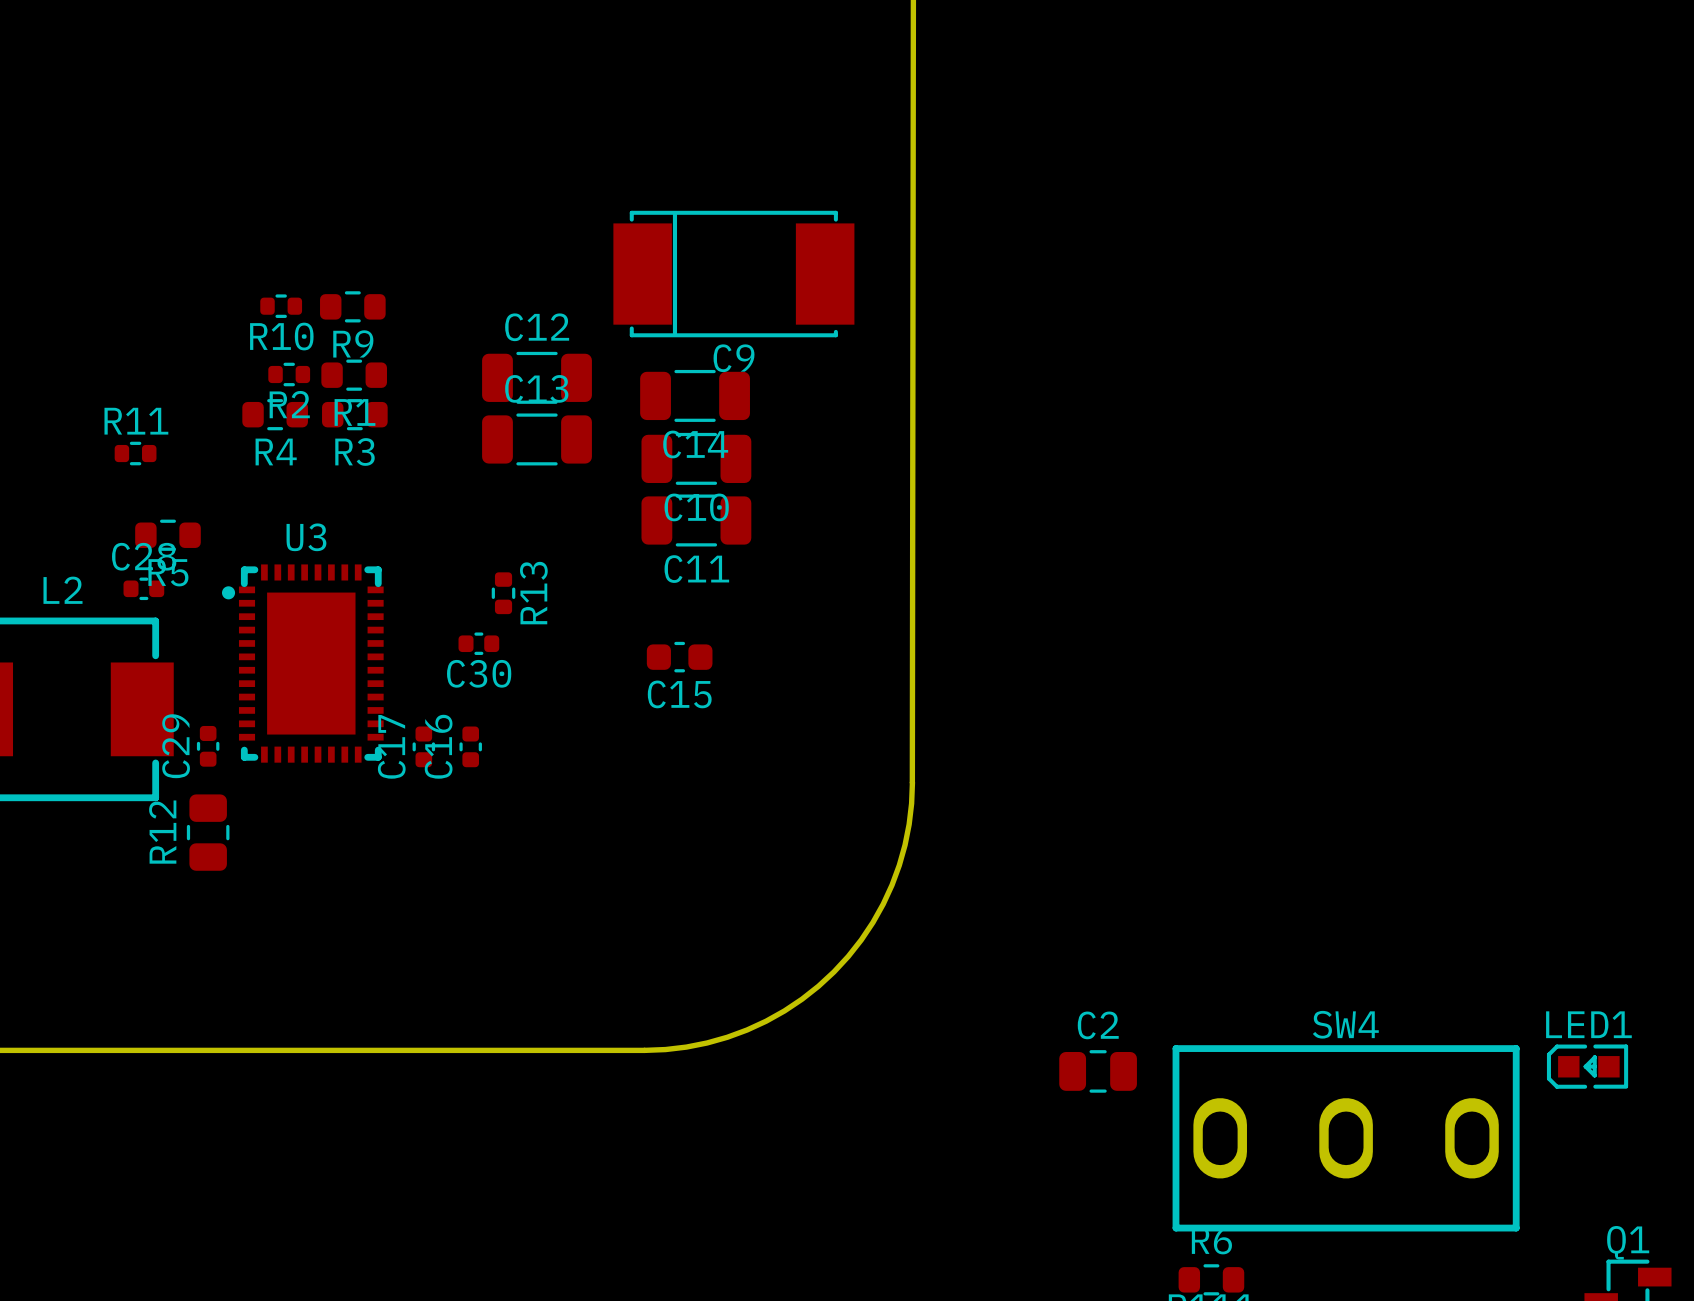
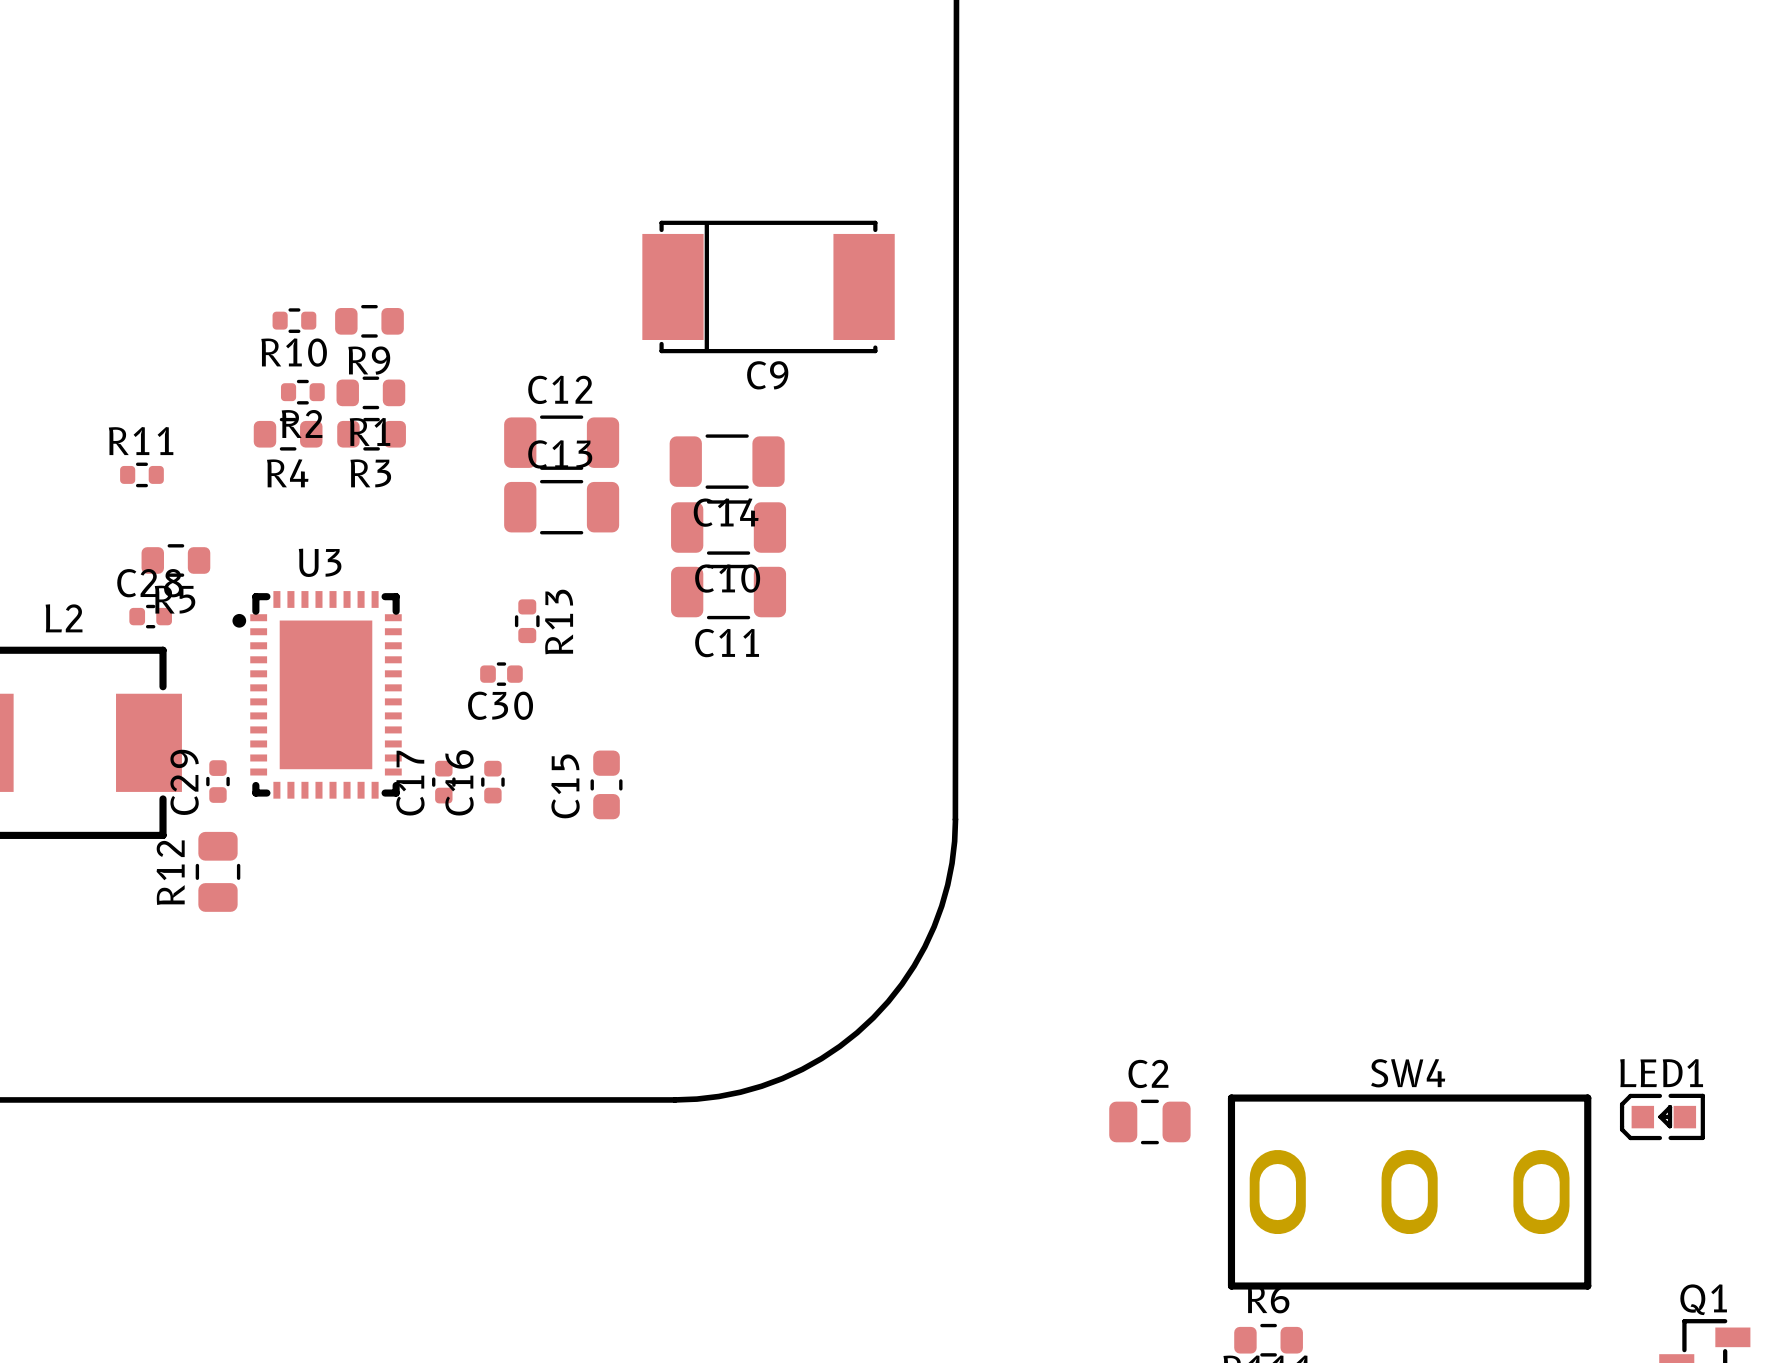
C12 position: (537, 377) -> (561, 442)
C14 position: (695, 395) -> (727, 461)
C13 position: (537, 439) -> (561, 507)
C10 position: (696, 458) -> (728, 527)
C11 position: (696, 520) -> (728, 592)
C15 rotation: 0° (679, 657) -> 90° clockwise (606, 784)
C15 position: (679, 657) -> (606, 784)

